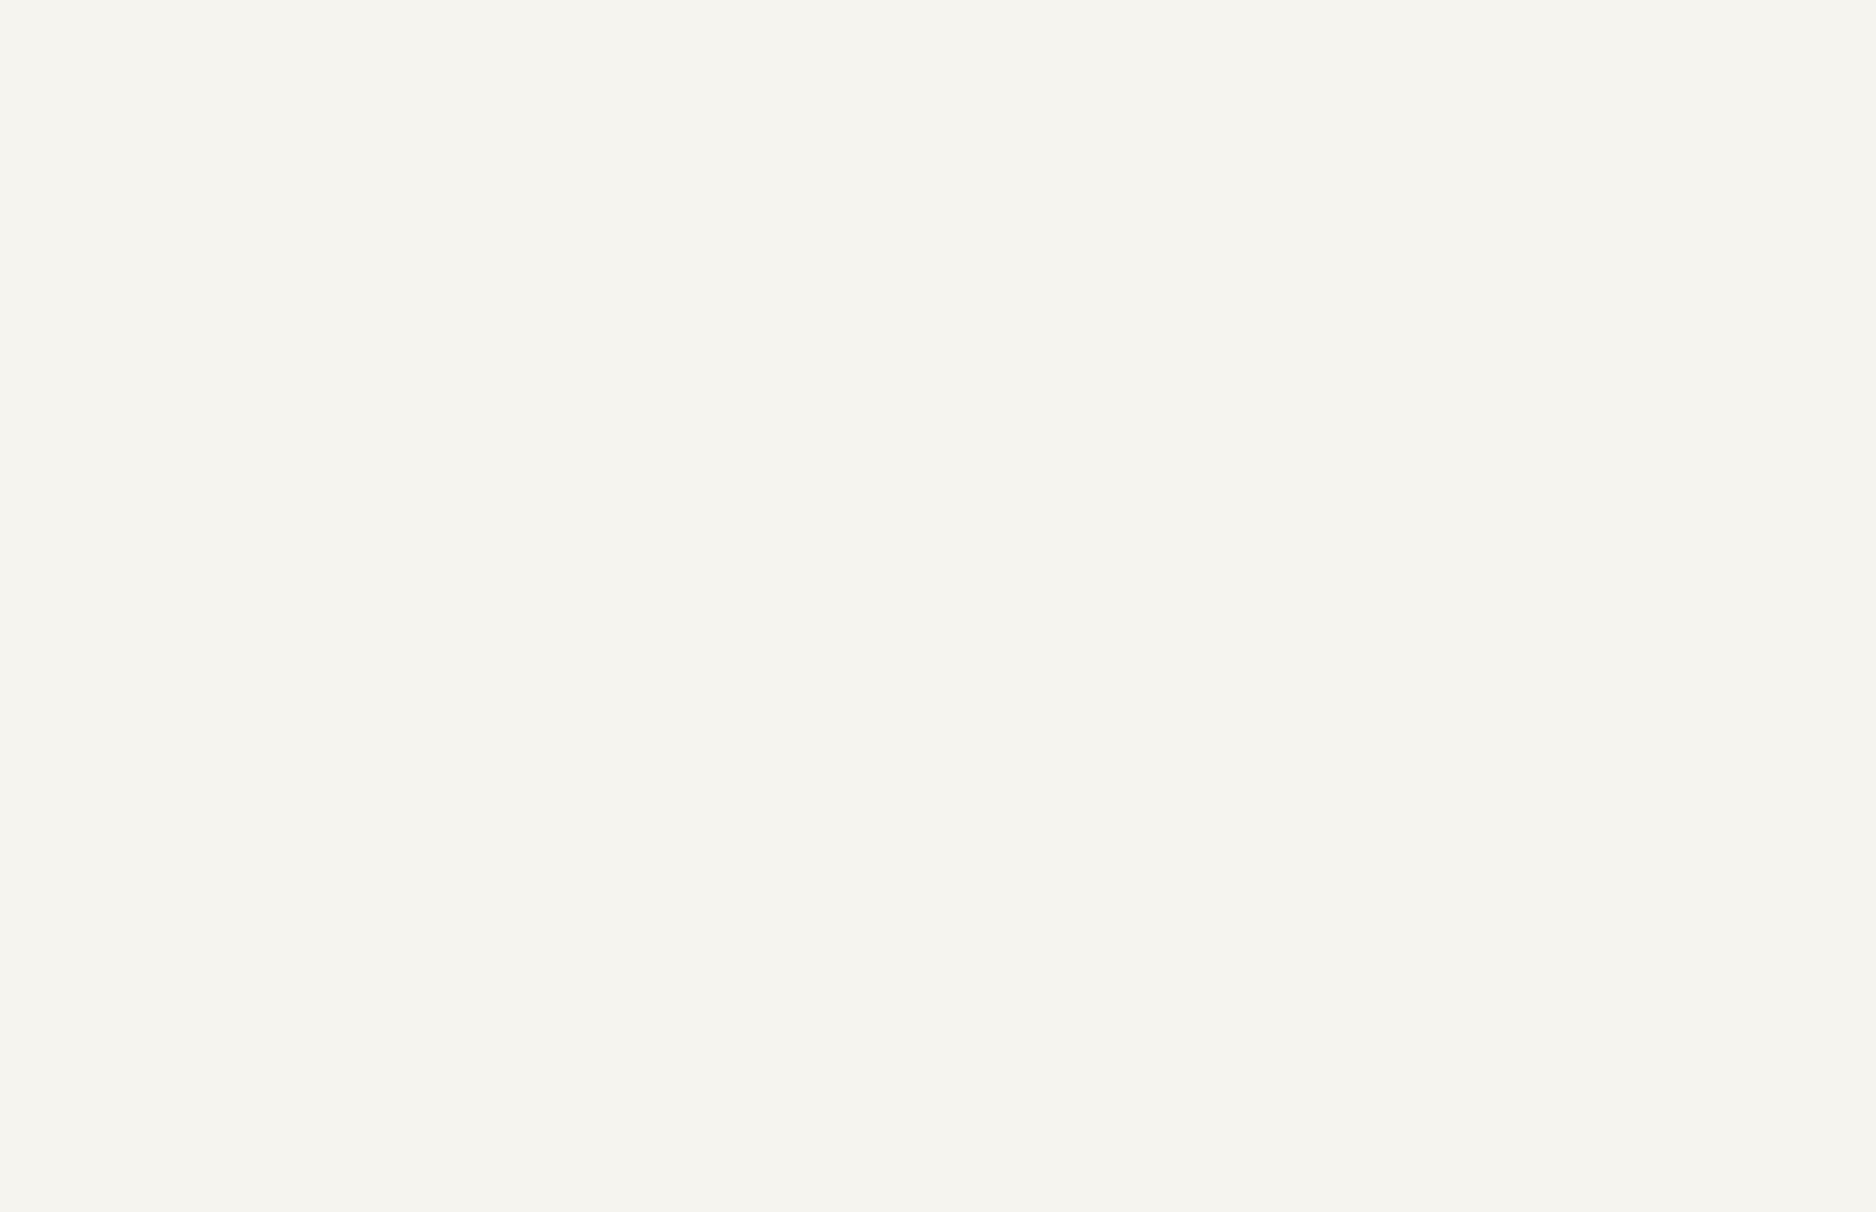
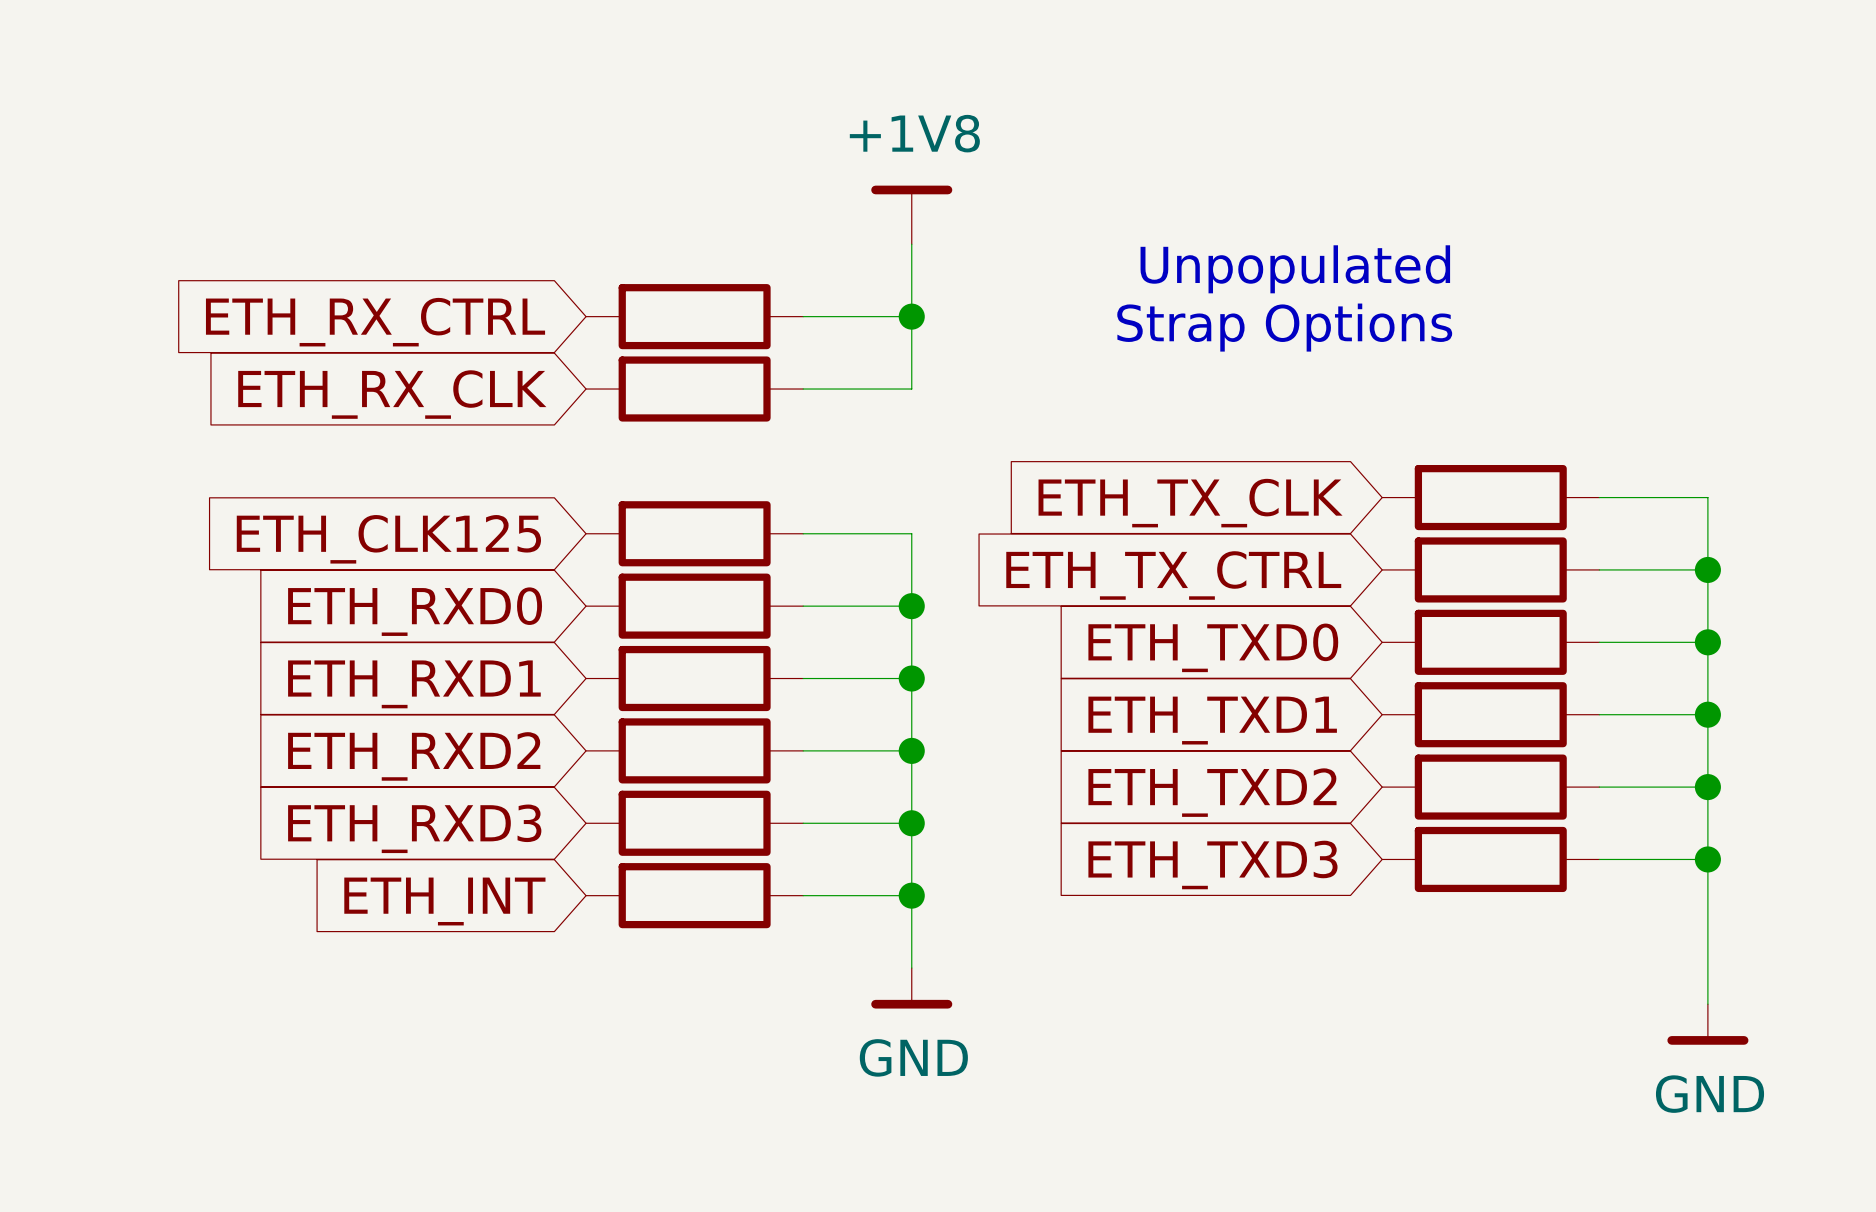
power symbol: none -> +1V8 (911, 214)
wire: none -> (911, 244) (911, 389) (803, 389)
text: none -> Unpopulated (1295, 269)
part: none -> (694, 316)
wire: none -> (803, 316) (911, 316)
junction: none -> (911, 316)
global label: none -> ETH_RX_CTRL (375, 322)
text: none -> Strap Options (1284, 327)
part: none -> (694, 389)
global label: none -> ETH_RX_CLK (392, 394)
part: none -> (1490, 497)
wire: none -> (1599, 497) (1707, 497) (1707, 1004)
global label: none -> ETH_TX_CLK (1190, 503)
part: none -> (694, 533)
wire: none -> (803, 533) (911, 533) (911, 968)
global label: none -> ETH_CLK125 (388, 539)
part: none -> (1490, 569)
wire: none -> (1599, 569) (1707, 569)
junction: none -> (1707, 569)
global label: none -> ETH_TX_CTRL (1173, 575)
part: none -> (694, 606)
wire: none -> (803, 606) (911, 606)
junction: none -> (911, 606)
global label: none -> ETH_RXD0 (415, 611)
part: none -> (1490, 642)
wire: none -> (1599, 642) (1707, 642)
junction: none -> (1707, 642)
global label: none -> ETH_TXD0 (1213, 647)
part: none -> (694, 678)
wire: none -> (803, 678) (911, 678)
junction: none -> (911, 678)
global label: none -> ETH_RXD1 (414, 684)
part: none -> (1490, 714)
wire: none -> (1599, 714) (1707, 714)
junction: none -> (1707, 714)
global label: none -> ETH_TXD1 (1212, 720)
part: none -> (694, 750)
wire: none -> (803, 750) (911, 750)
junction: none -> (911, 750)
global label: none -> ETH_RXD2 (414, 756)
part: none -> (1490, 787)
wire: none -> (1599, 787) (1707, 787)
junction: none -> (1707, 787)
global label: none -> ETH_TXD2 (1212, 792)
part: none -> (694, 823)
wire: none -> (803, 823) (911, 823)
junction: none -> (911, 823)
global label: none -> ETH_RXD3 (414, 828)
part: none -> (1490, 859)
wire: none -> (1599, 859) (1707, 859)
junction: none -> (1707, 859)
global label: none -> ETH_TXD3 (1212, 864)
part: none -> (694, 895)
wire: none -> (803, 895) (911, 895)
junction: none -> (911, 895)
global label: none -> ETH_INT (444, 901)
power symbol: none -> GND (911, 988)
power symbol: none -> GND (1707, 1024)

